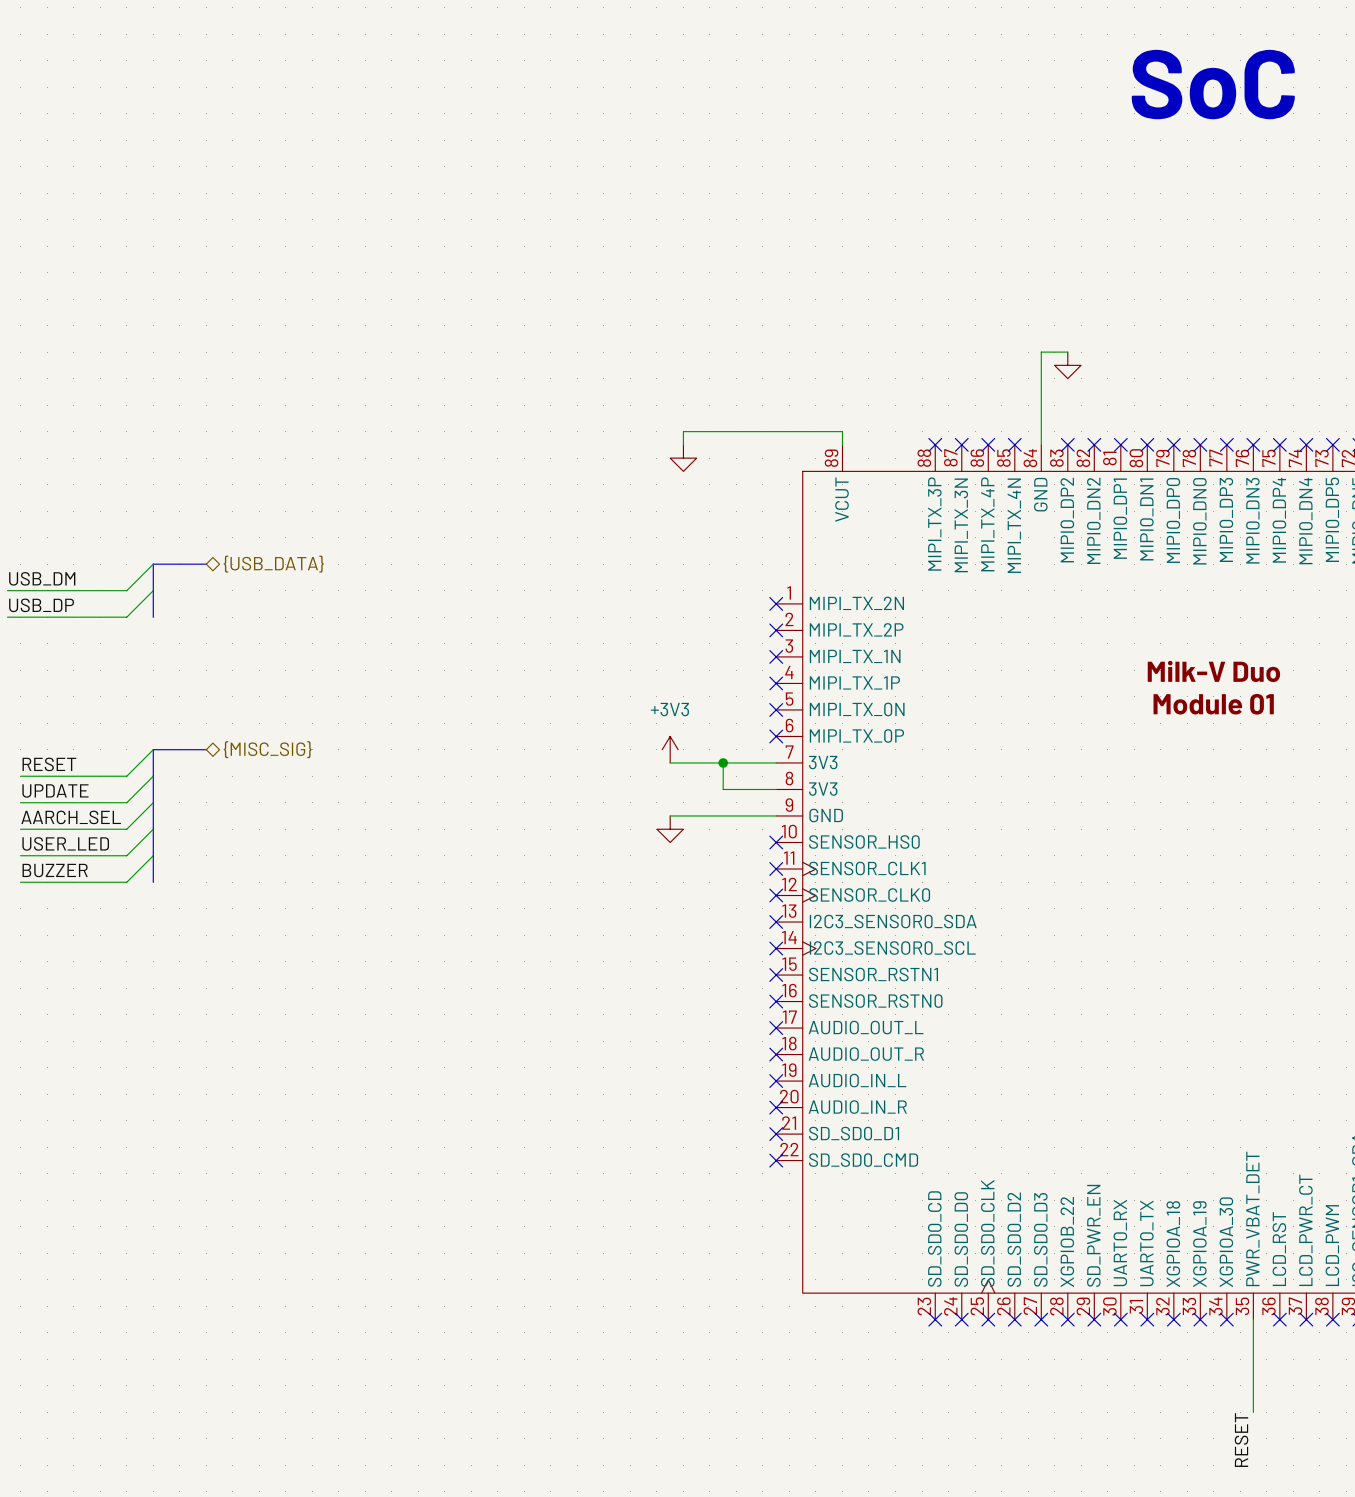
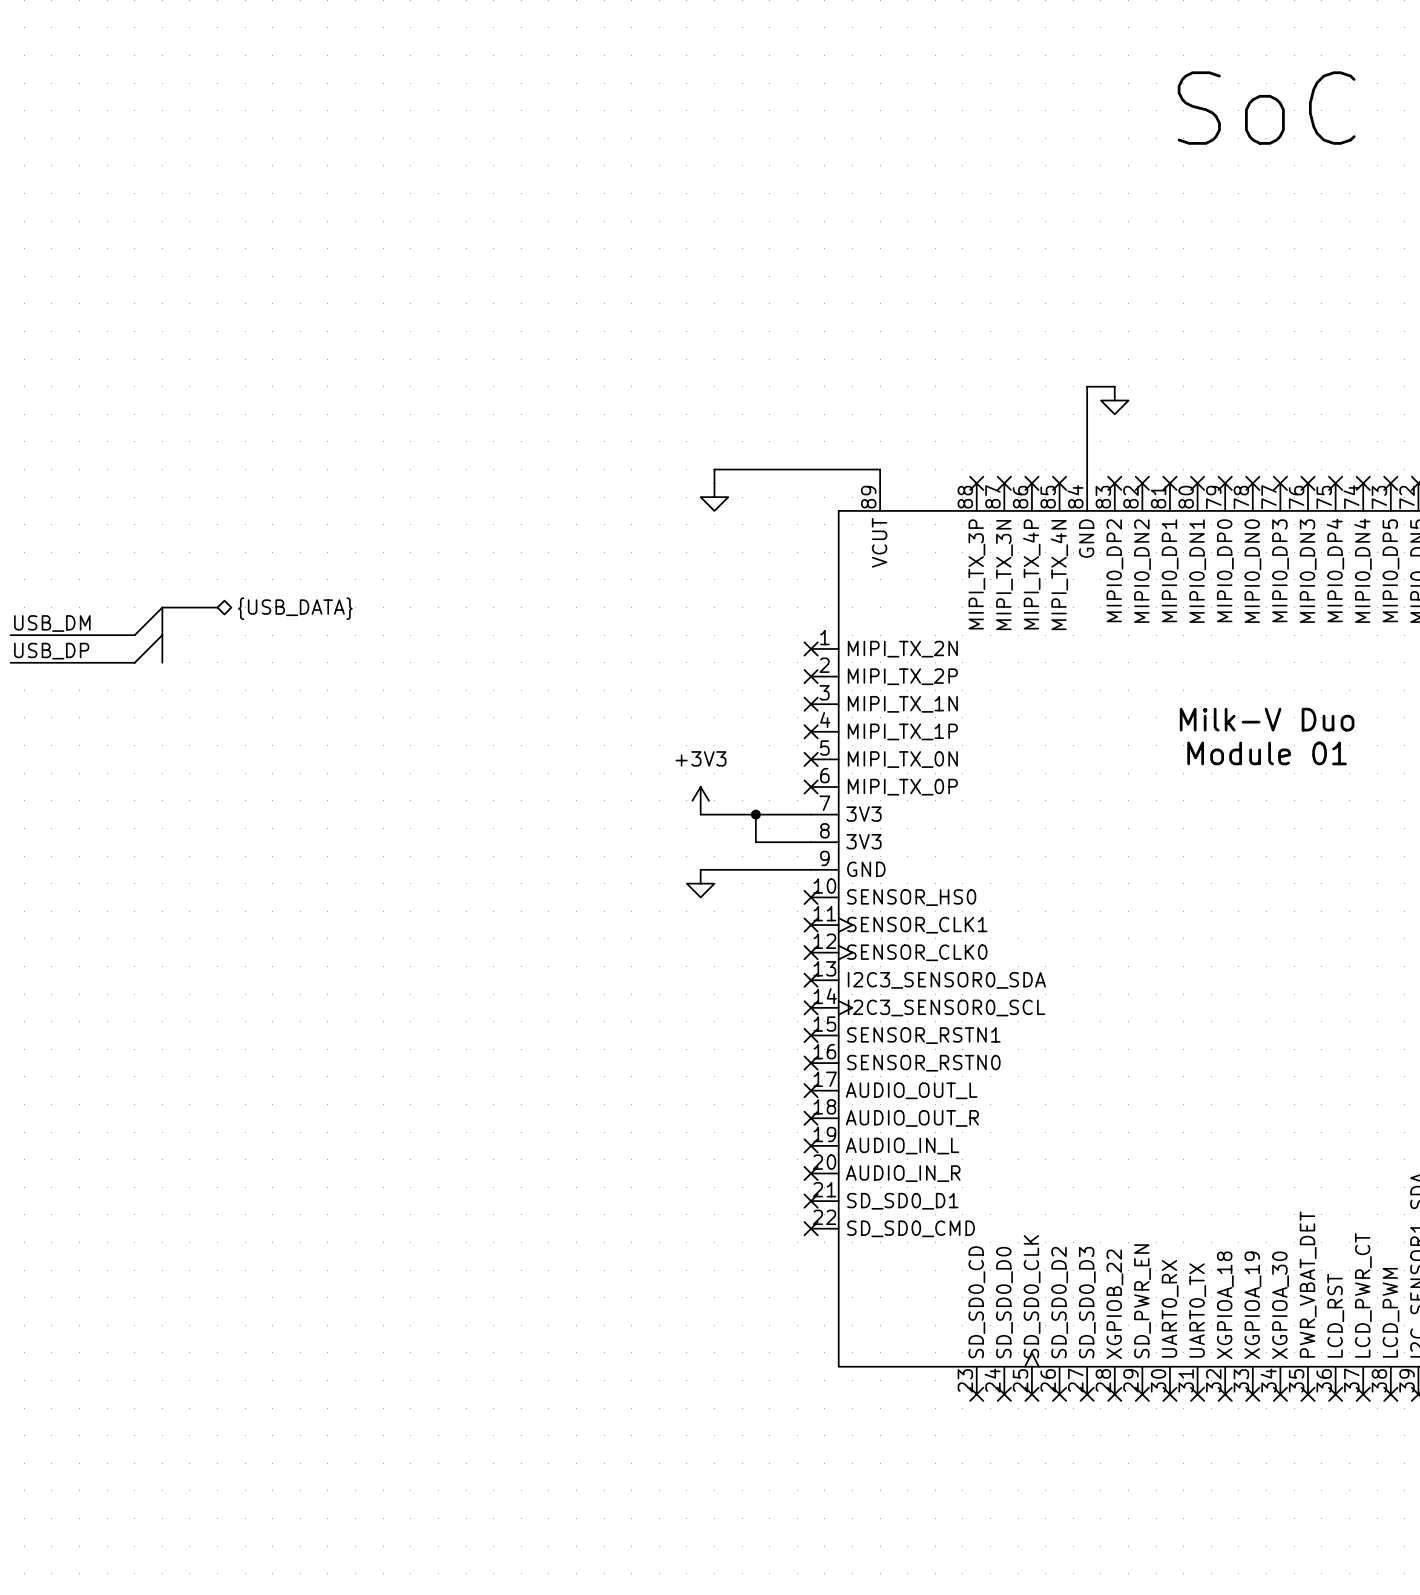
wire: (153, 749) (126, 776) (20, 776) -> none
bus: (206, 749) (153, 749) (153, 882) -> none
hierarchical label: {MISC_SIG} (267, 749) -> none
label: RESET (49, 764) -> none
wire: (153, 776) (126, 802) (20, 802) -> none
label: UPDATE (55, 790) -> none
wire: (153, 802) (126, 829) (20, 829) -> none
label: AARCH_SEL (71, 817) -> none
wire: (153, 829) (126, 855) (20, 855) -> none
label: USER_LED (65, 843) -> none
wire: (153, 855) (126, 882) (20, 882) -> none
label: BUZZER (55, 870) -> none
wire: (1253, 1319) (1253, 1412) -> none
no-connect mark: none -> (1308, 1394)
label: RESET (1241, 1440) -> none

